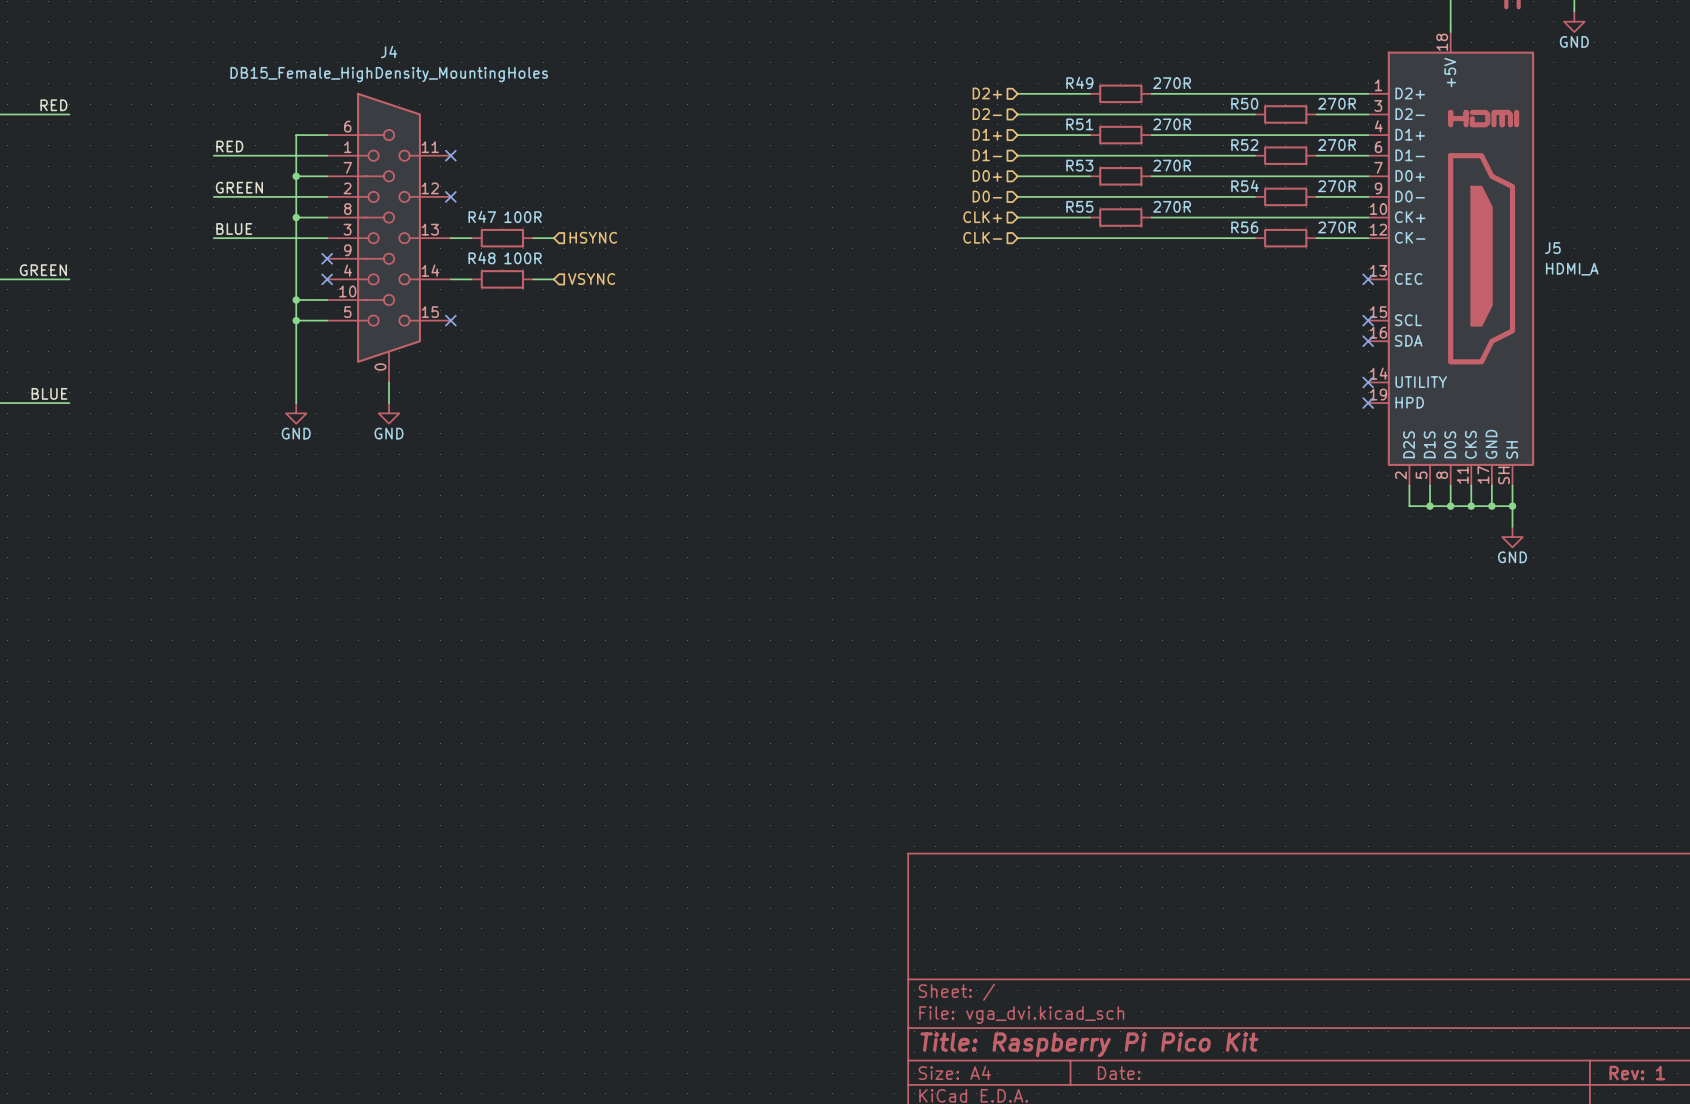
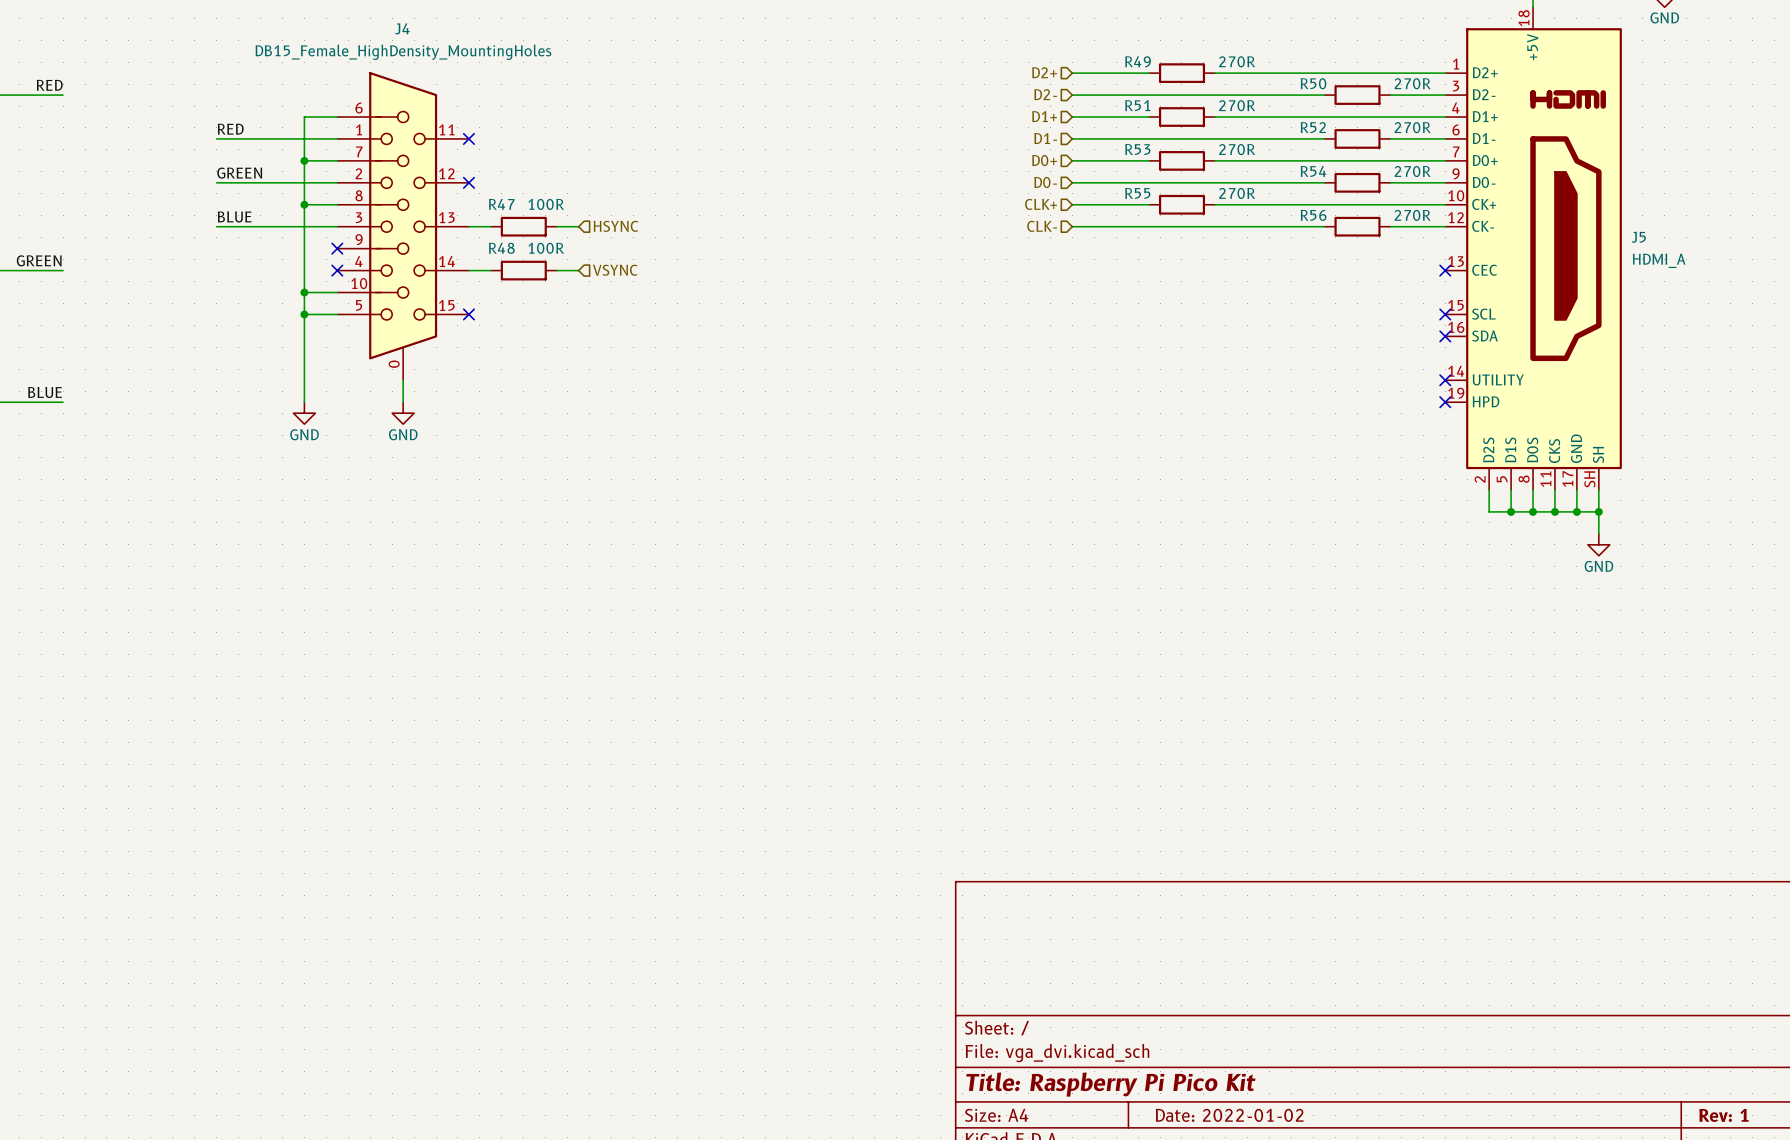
title block: Date: (1119, 1073) -> Date: 2022-01-02 (1229, 1115)

